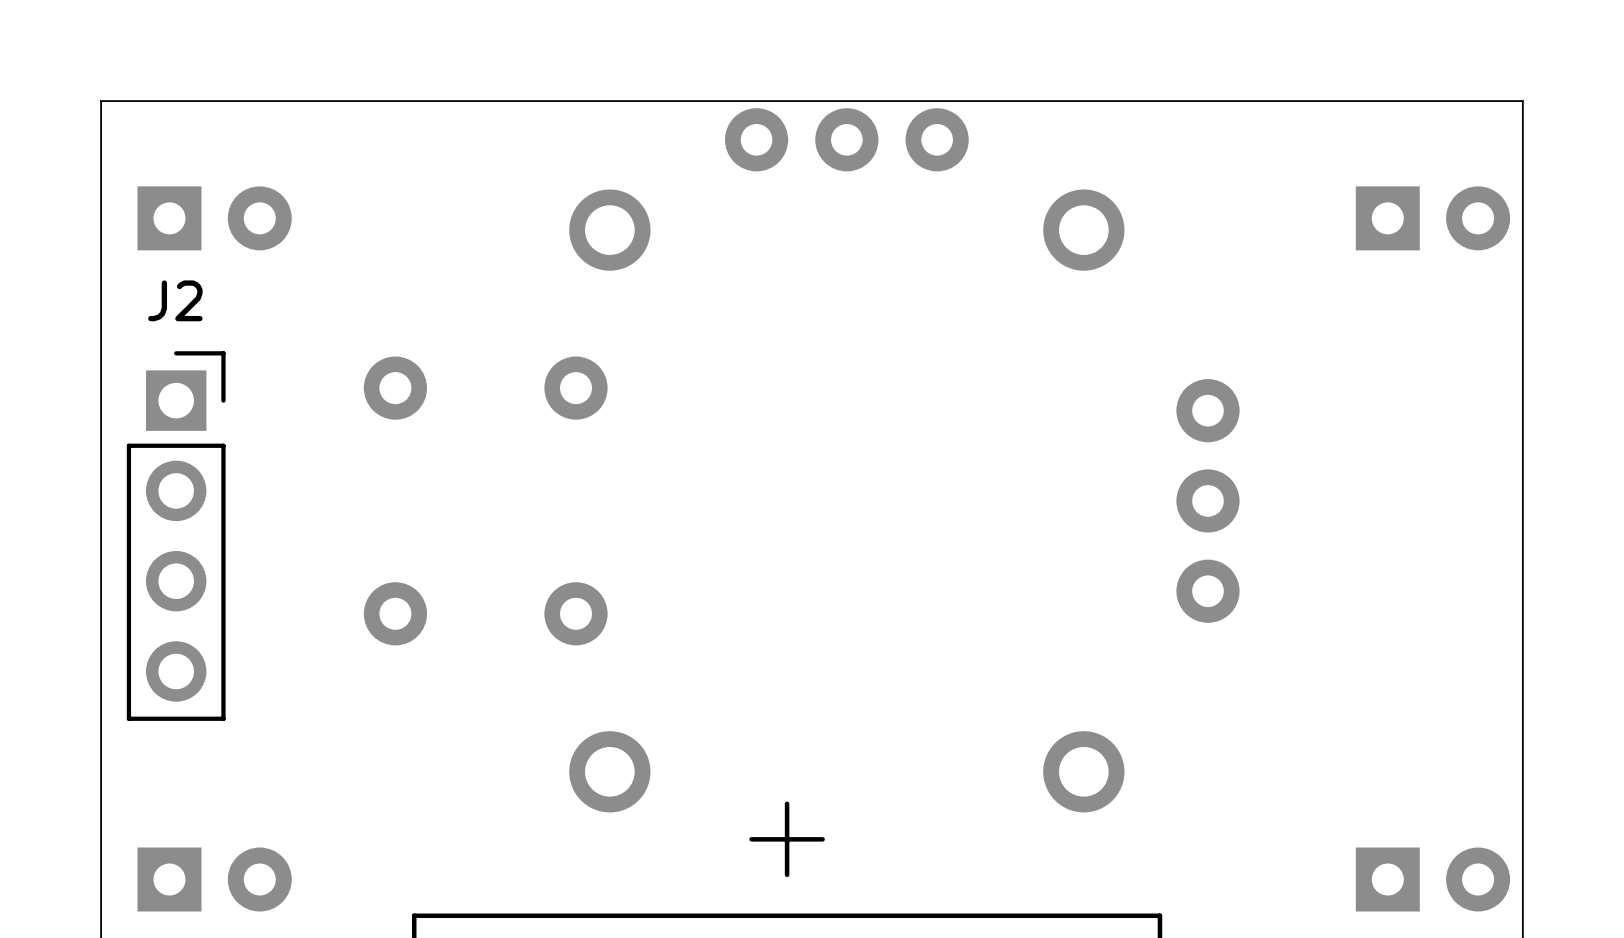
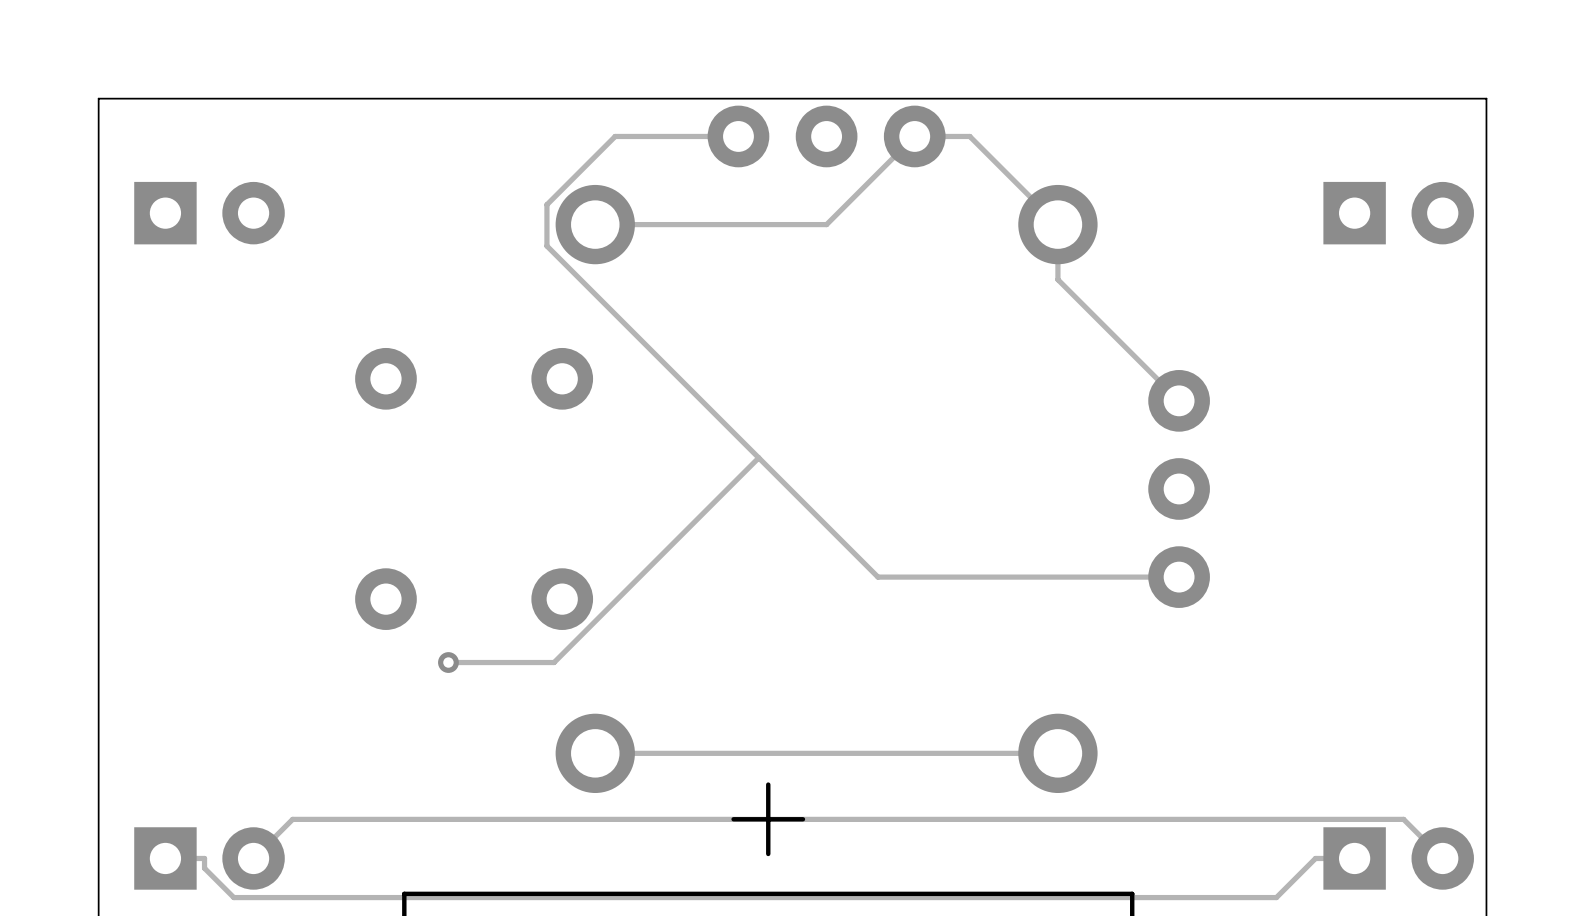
track: none -> (738, 136) (615, 136) (546, 204) (546, 246) (877, 577) (1179, 577)
track: none -> (595, 224) (826, 224) (914, 136) (969, 136) (1057, 224) (1057, 279) (1179, 400)
track: none -> (758, 457) (554, 662) (448, 662)
J2: (176, 536) -> none
via: none -> (448, 662)
track: none -> (1057, 753) (595, 753)
track: none -> (1354, 858) (1315, 858) (1276, 897) (233, 897) (204, 868) (204, 858) (165, 858)
track: none -> (1442, 858) (1403, 819) (292, 819) (253, 858)

